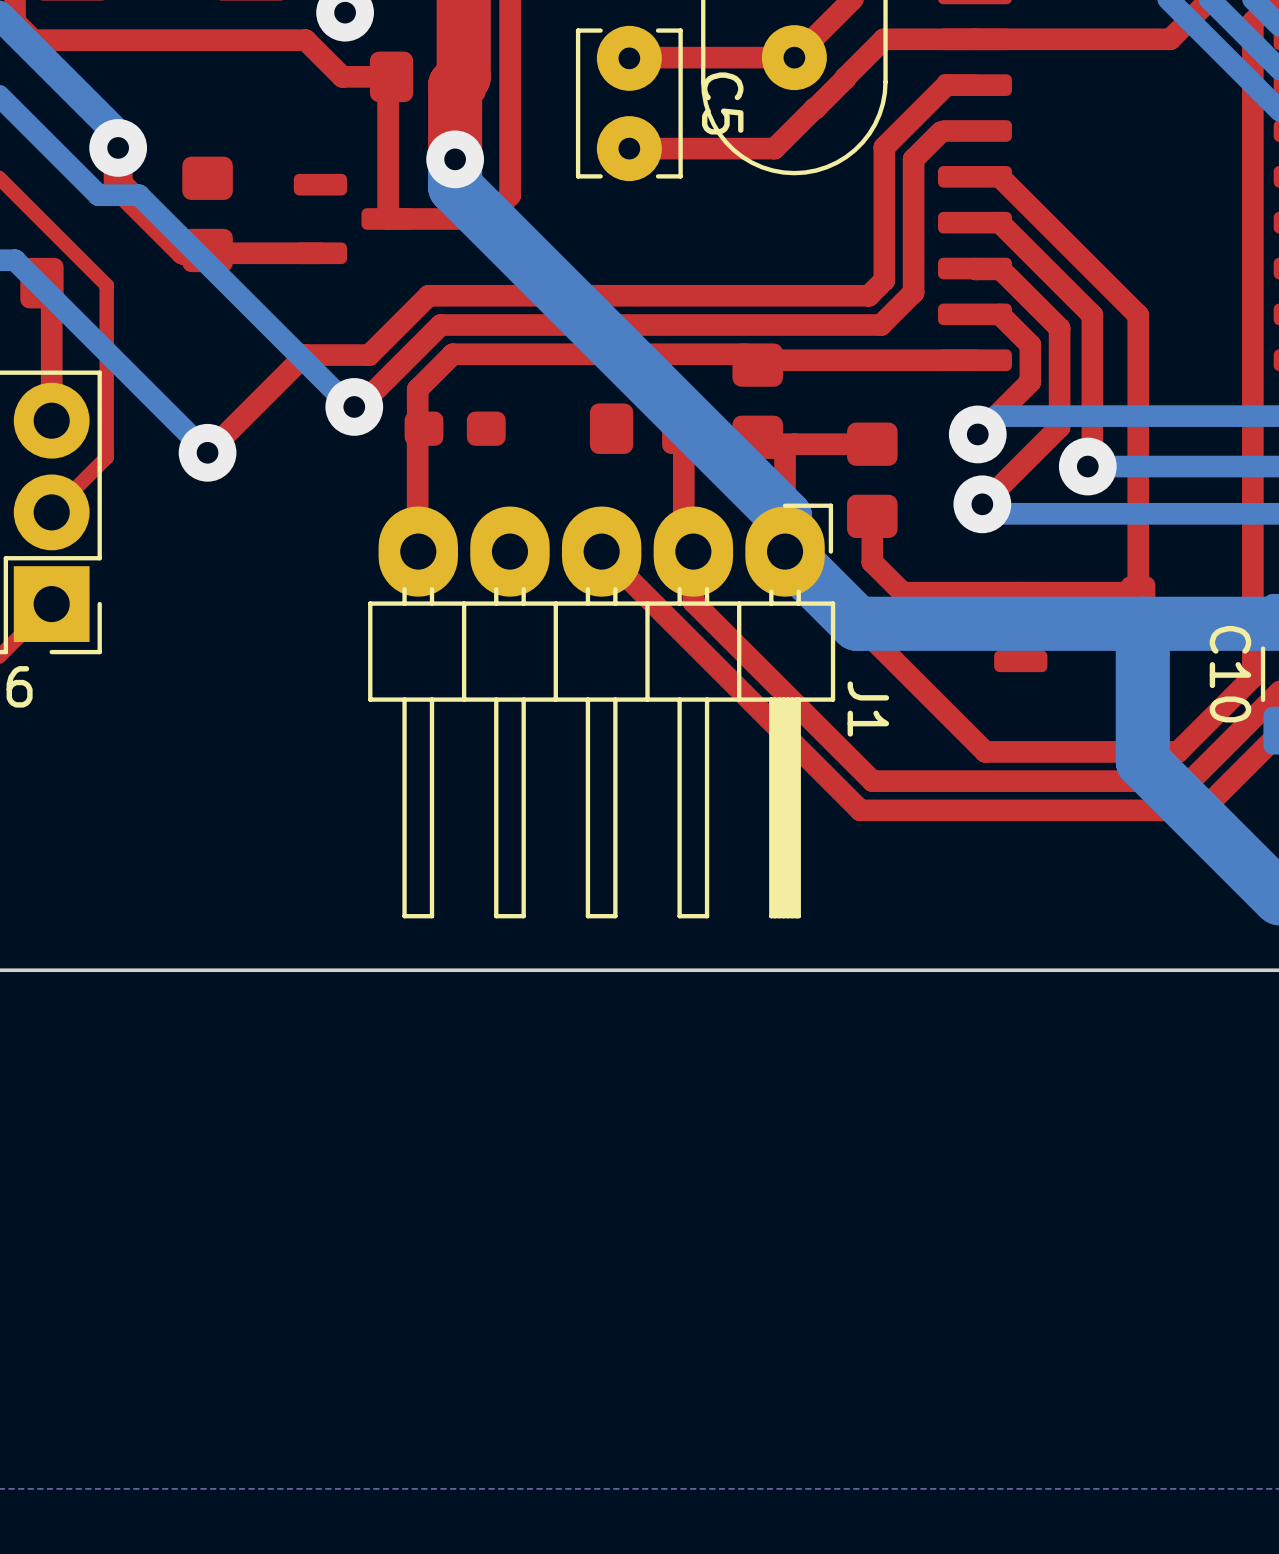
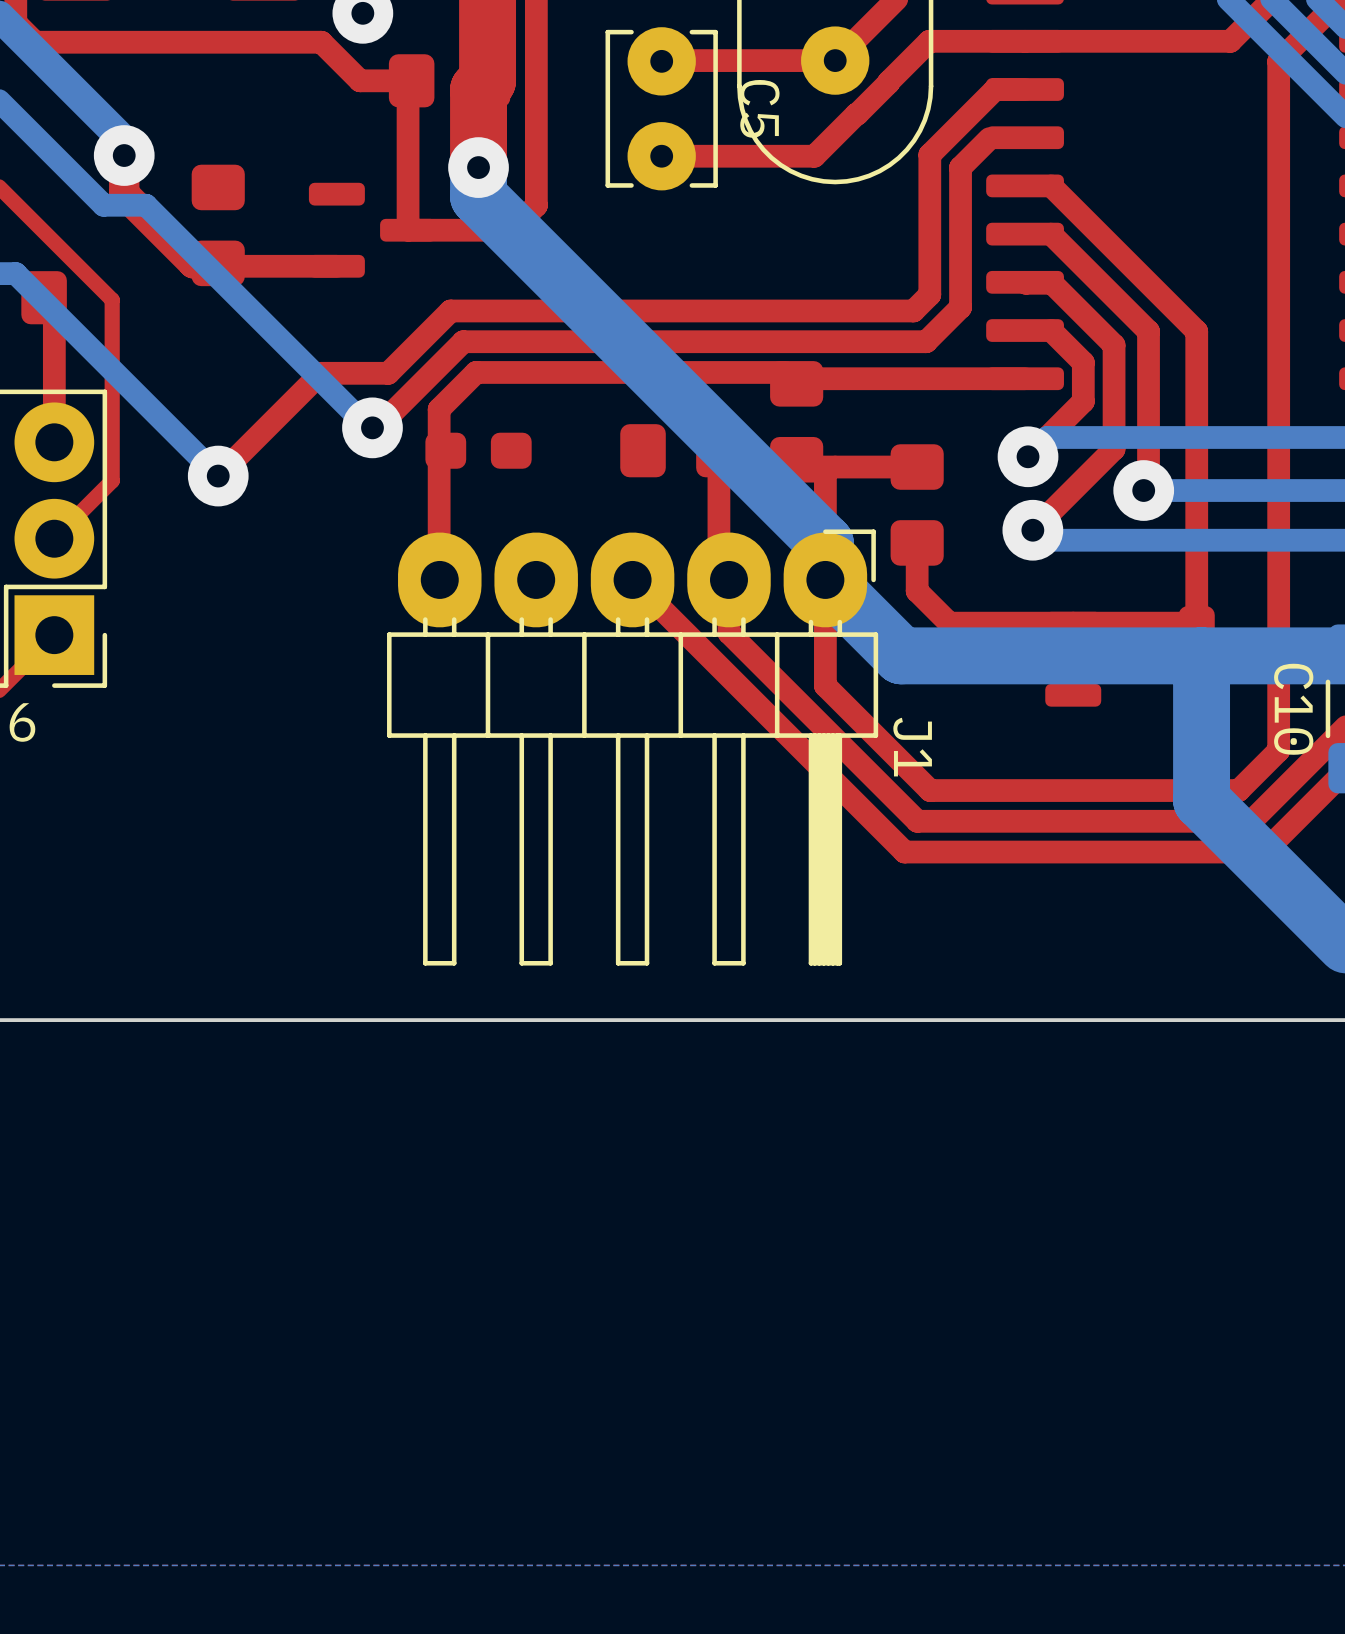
top track: (1252, 21) (1252, 677) (1216, 713) -> (1317, 22) (1278, 61) (1278, 750)
top track: (785, 551) (985, 751) -> (825, 579) (825, 685) (930, 790) (1036, 790)

